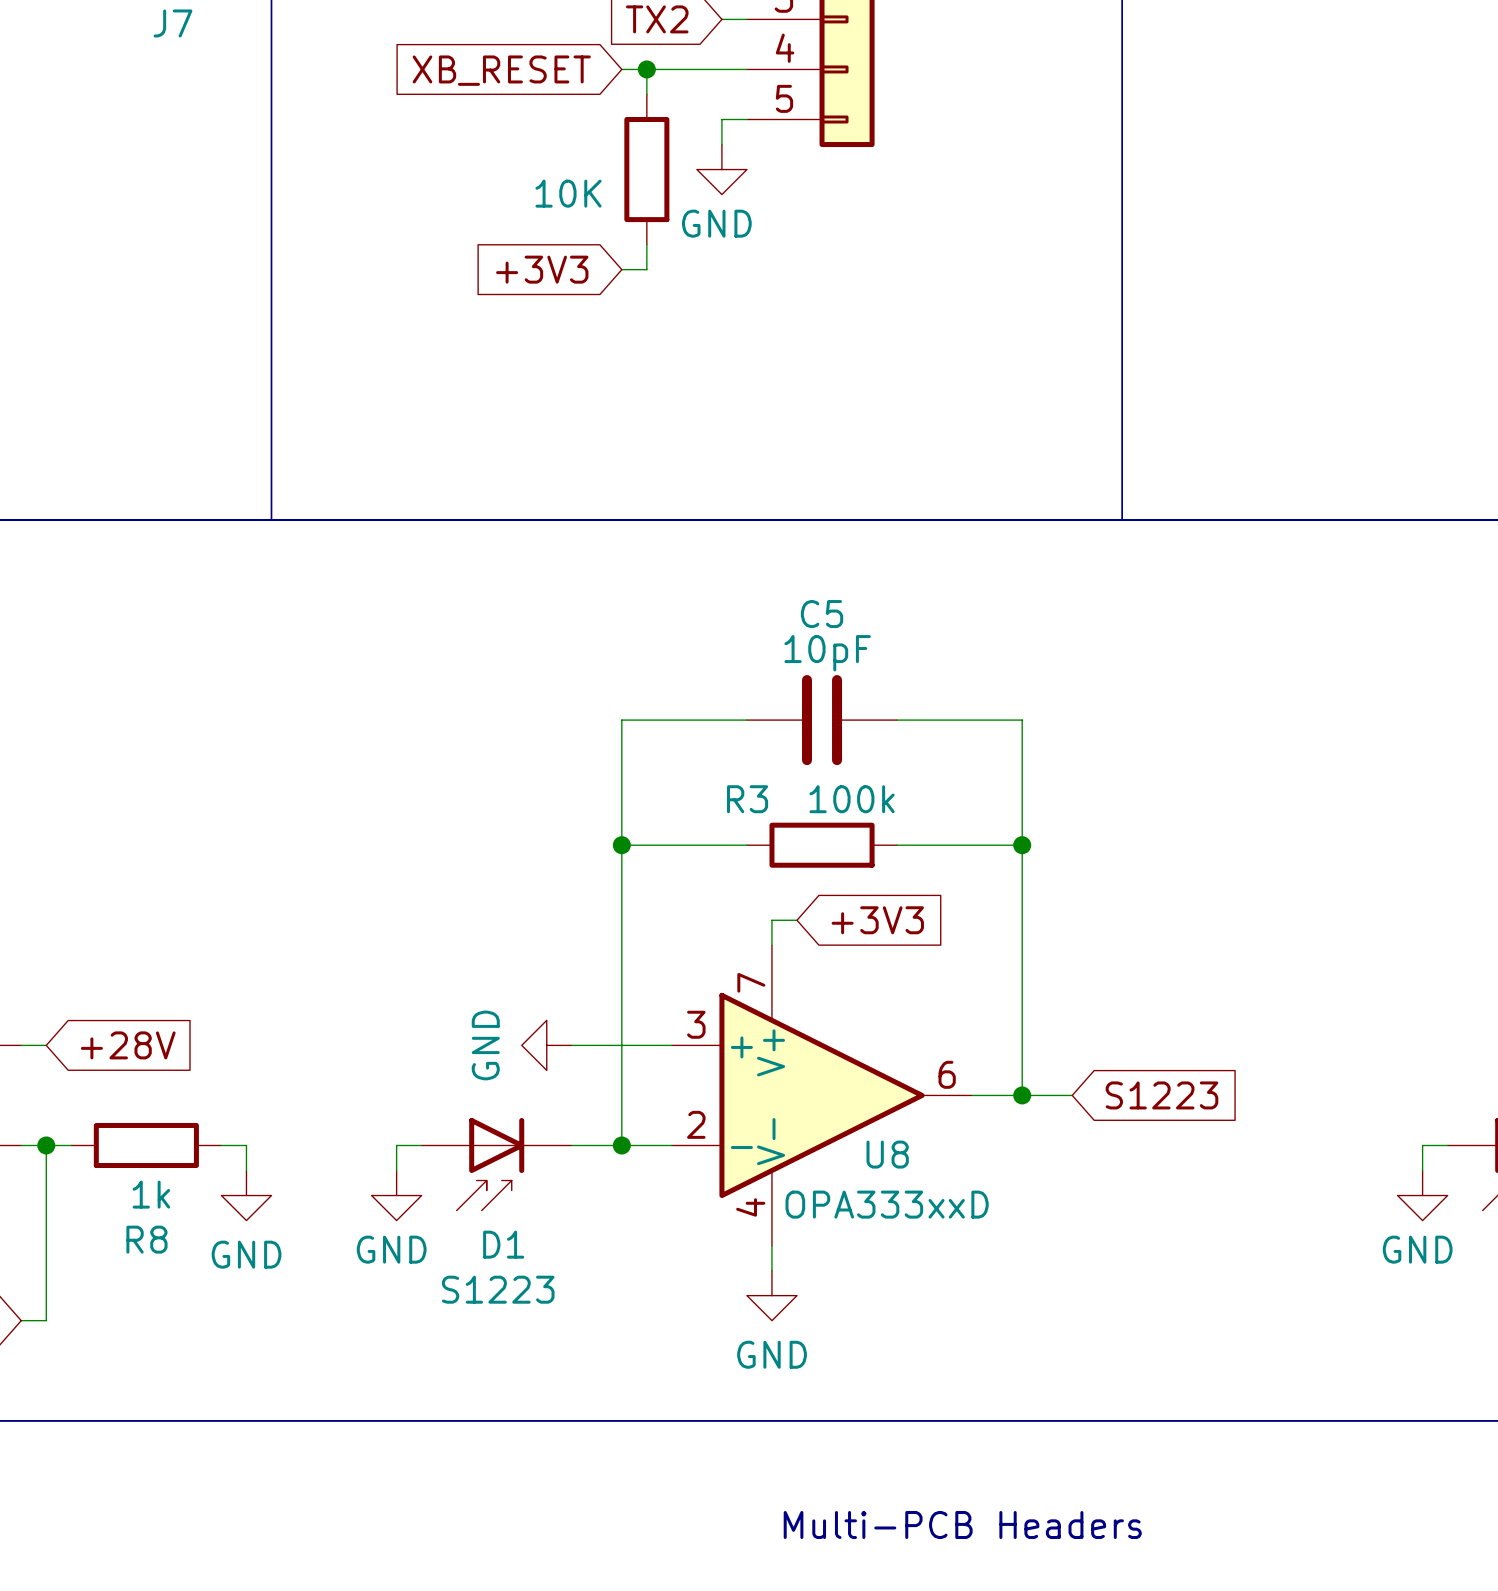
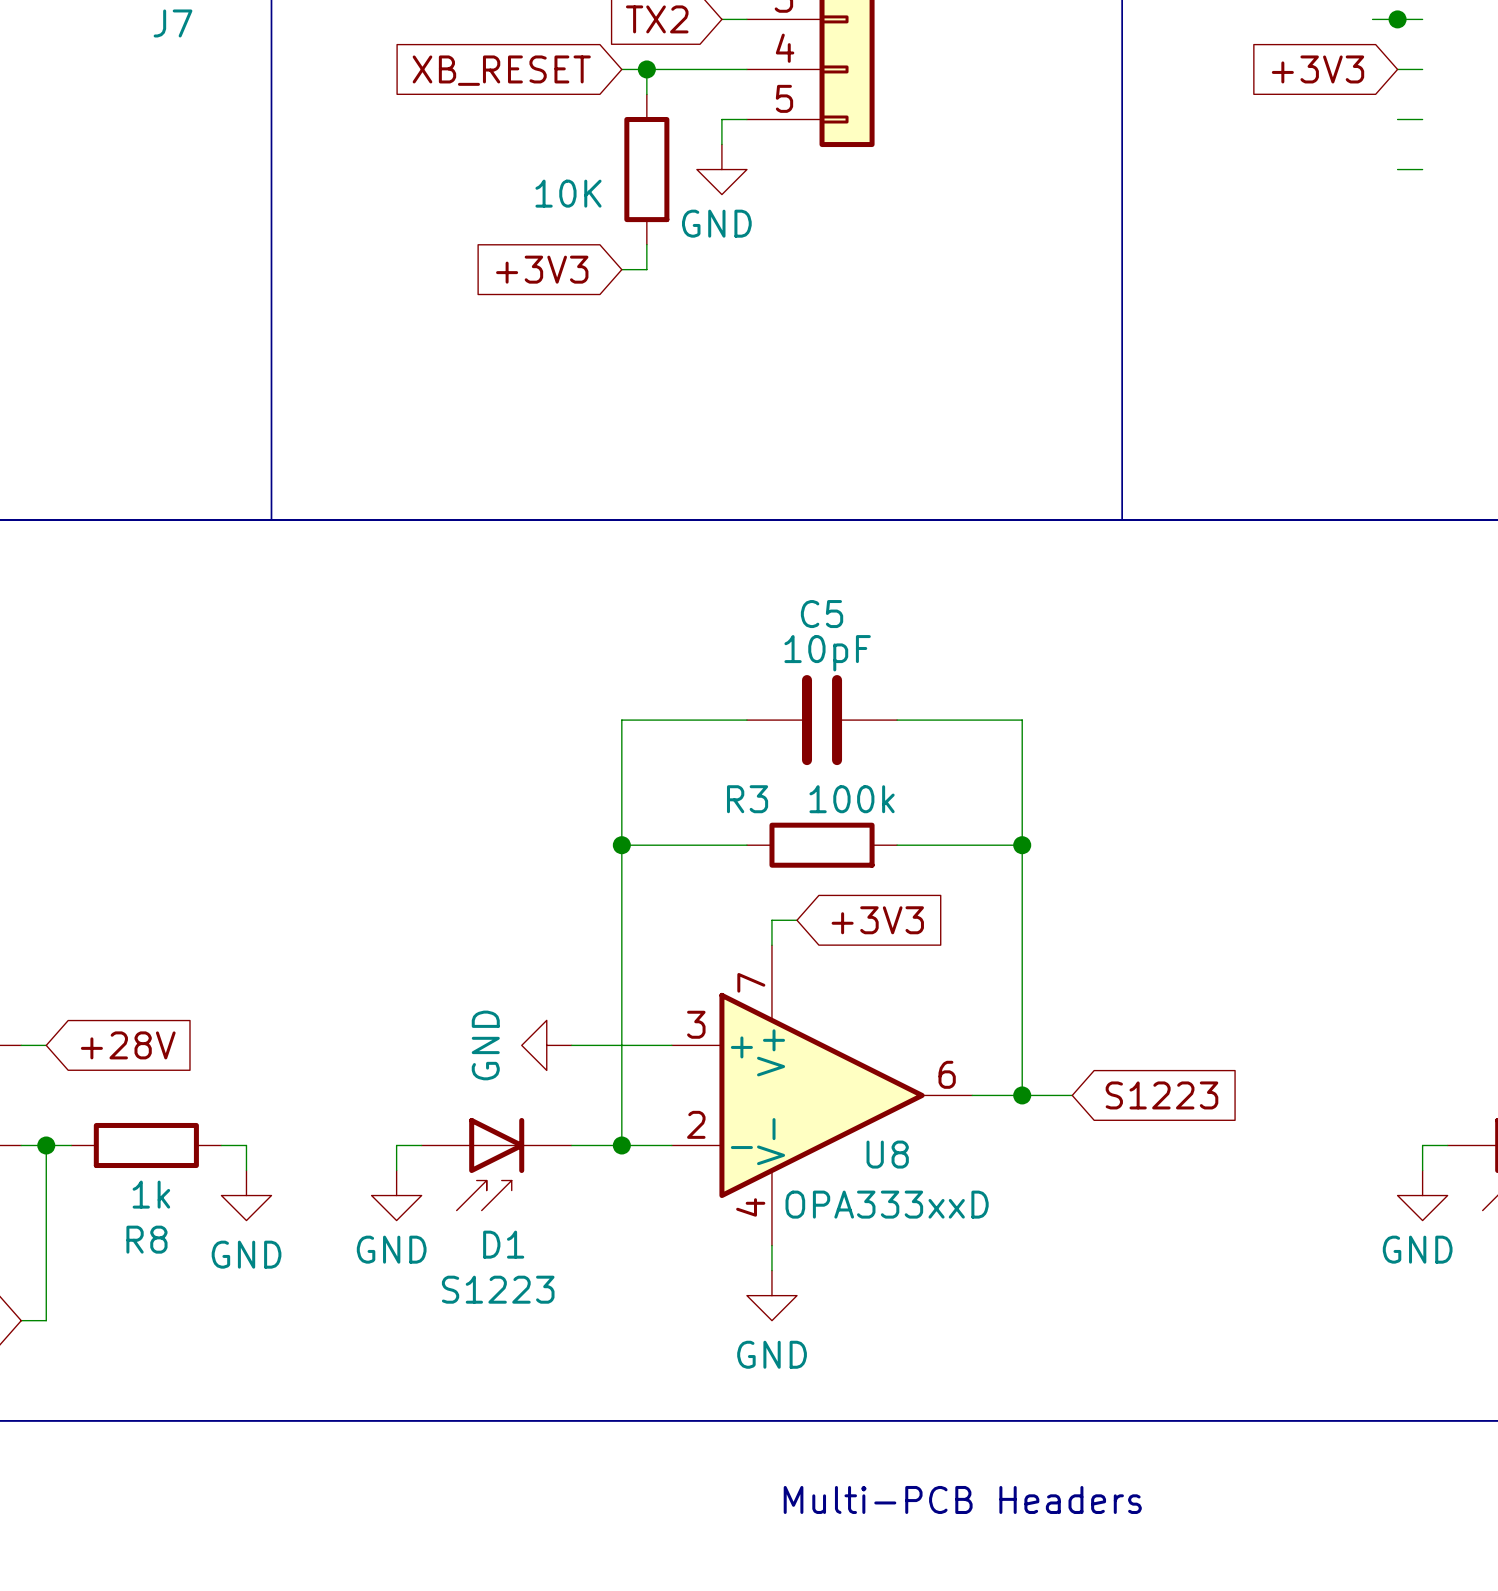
wire: none -> (1372, 19) (1422, 19)
junction: none -> (1397, 19)
global label: none -> +3V3 (1318, 69)
wire: none -> (1397, 69) (1422, 69)
wire: none -> (1397, 119) (1422, 119)
wire: none -> (1397, 169) (1422, 169)
text position: Multi-PCB Headers (962, 1525) -> Multi-PCB Headers (962, 1499)

